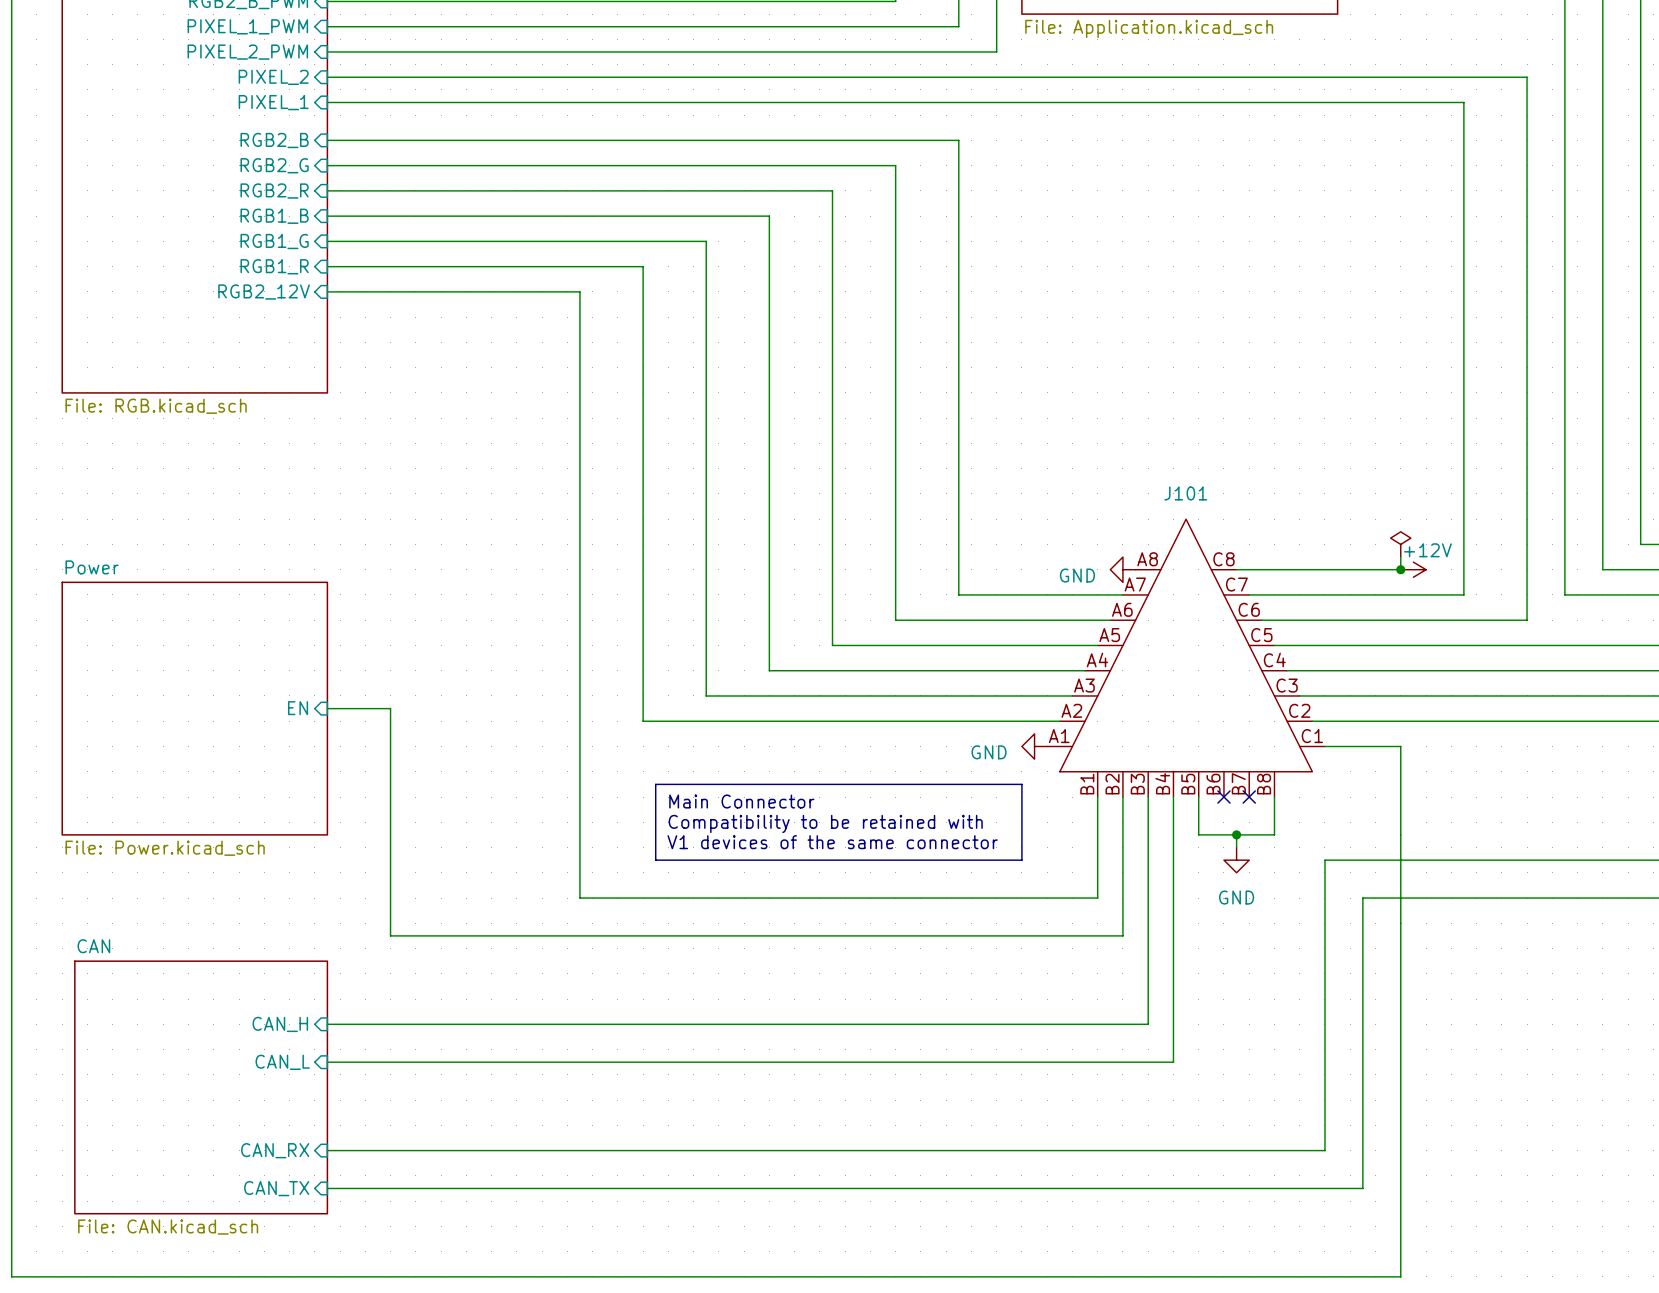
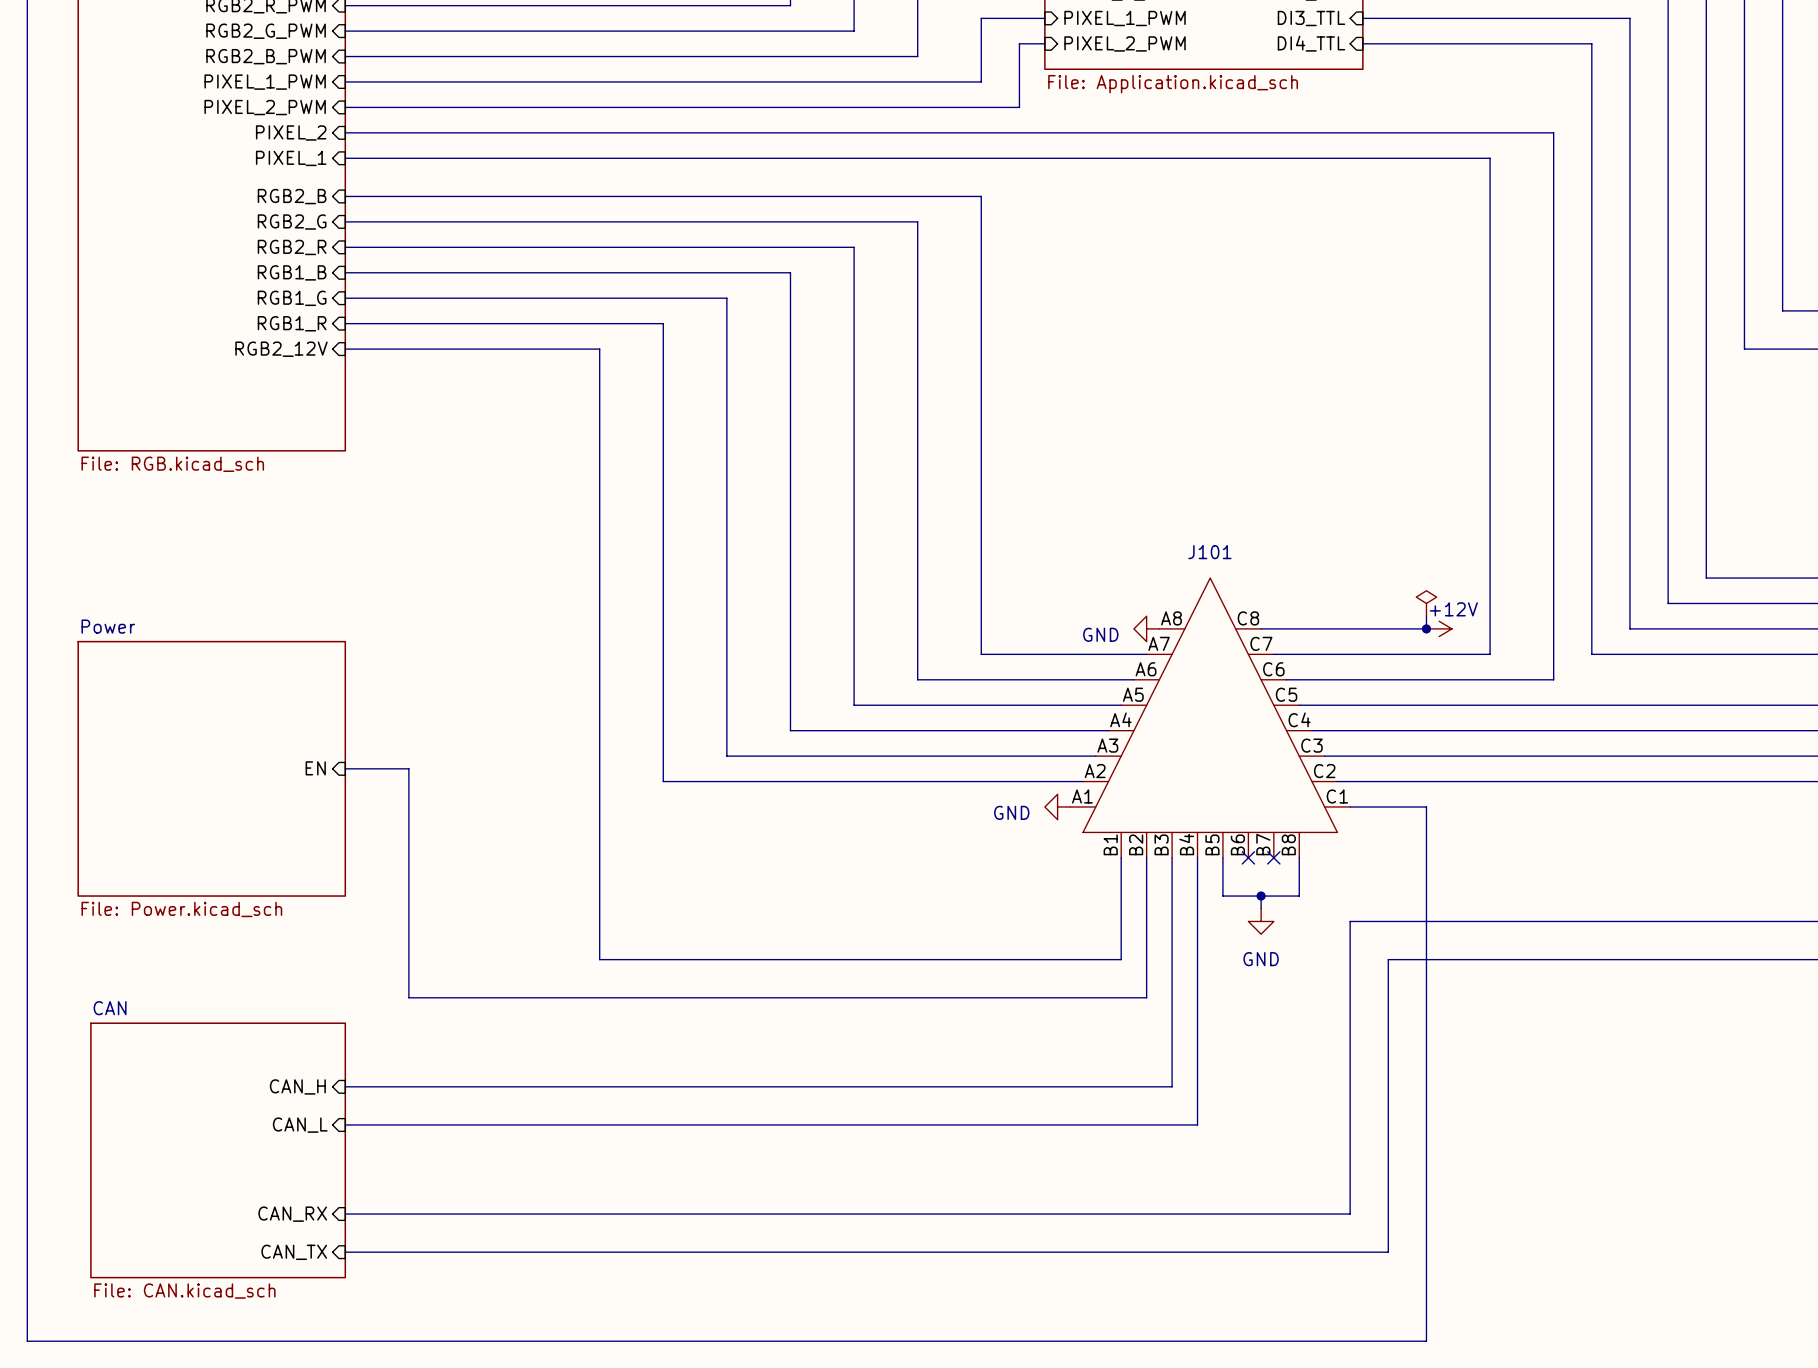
line: (655, 784) (1021, 784) (1021, 860) (655, 860) (655, 784) -> none
text: Main Connector (741, 801) -> none
text: Compatibility to be retained with (825, 823) -> none
text: V1 devices of the same connector (832, 842) -> none

